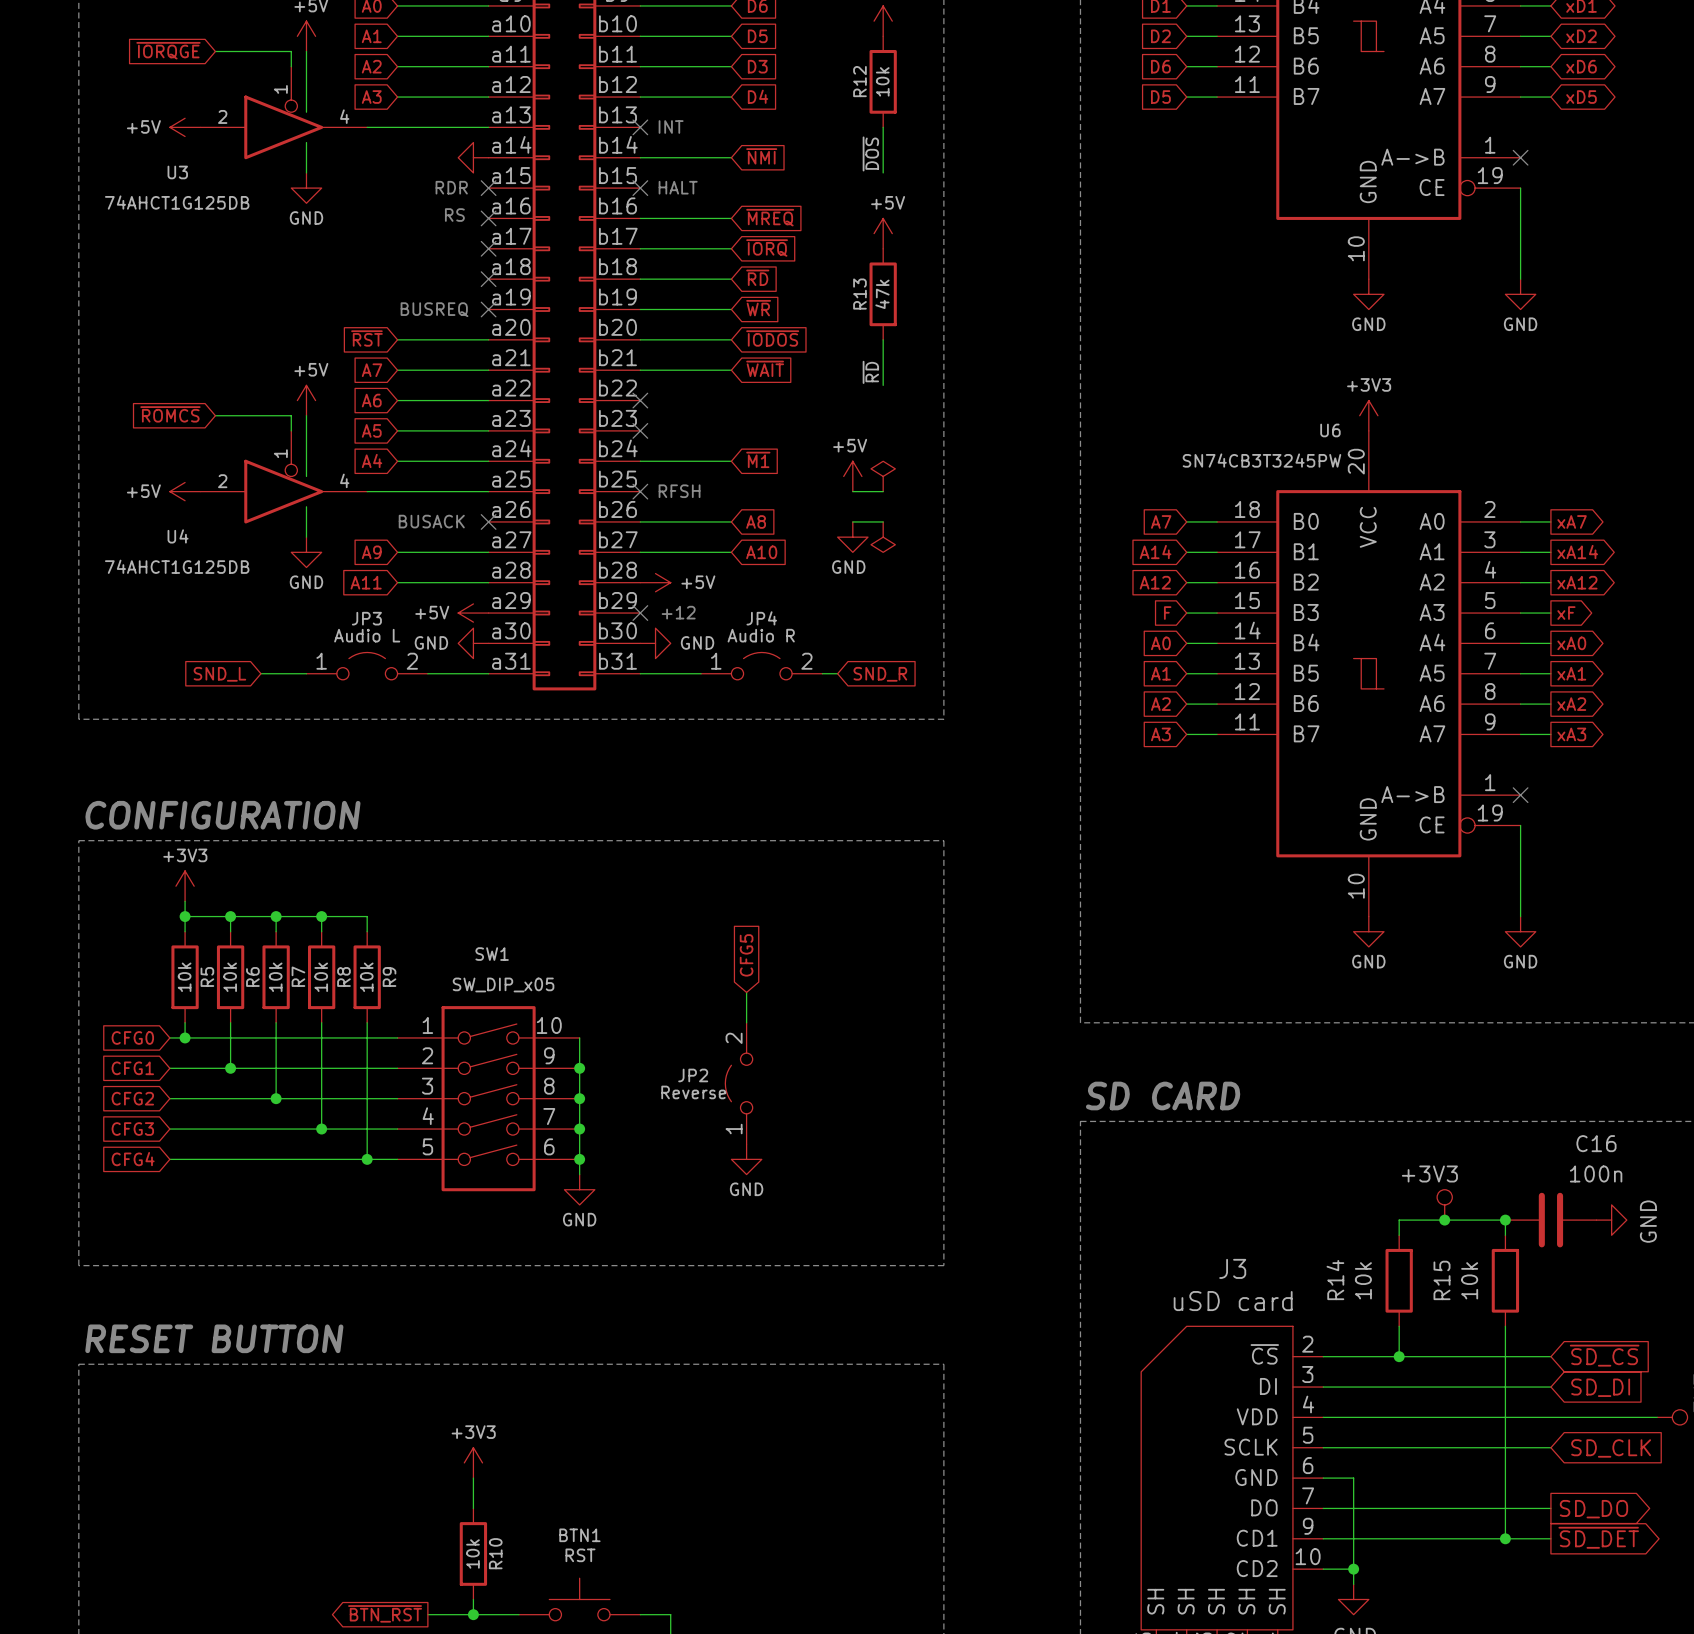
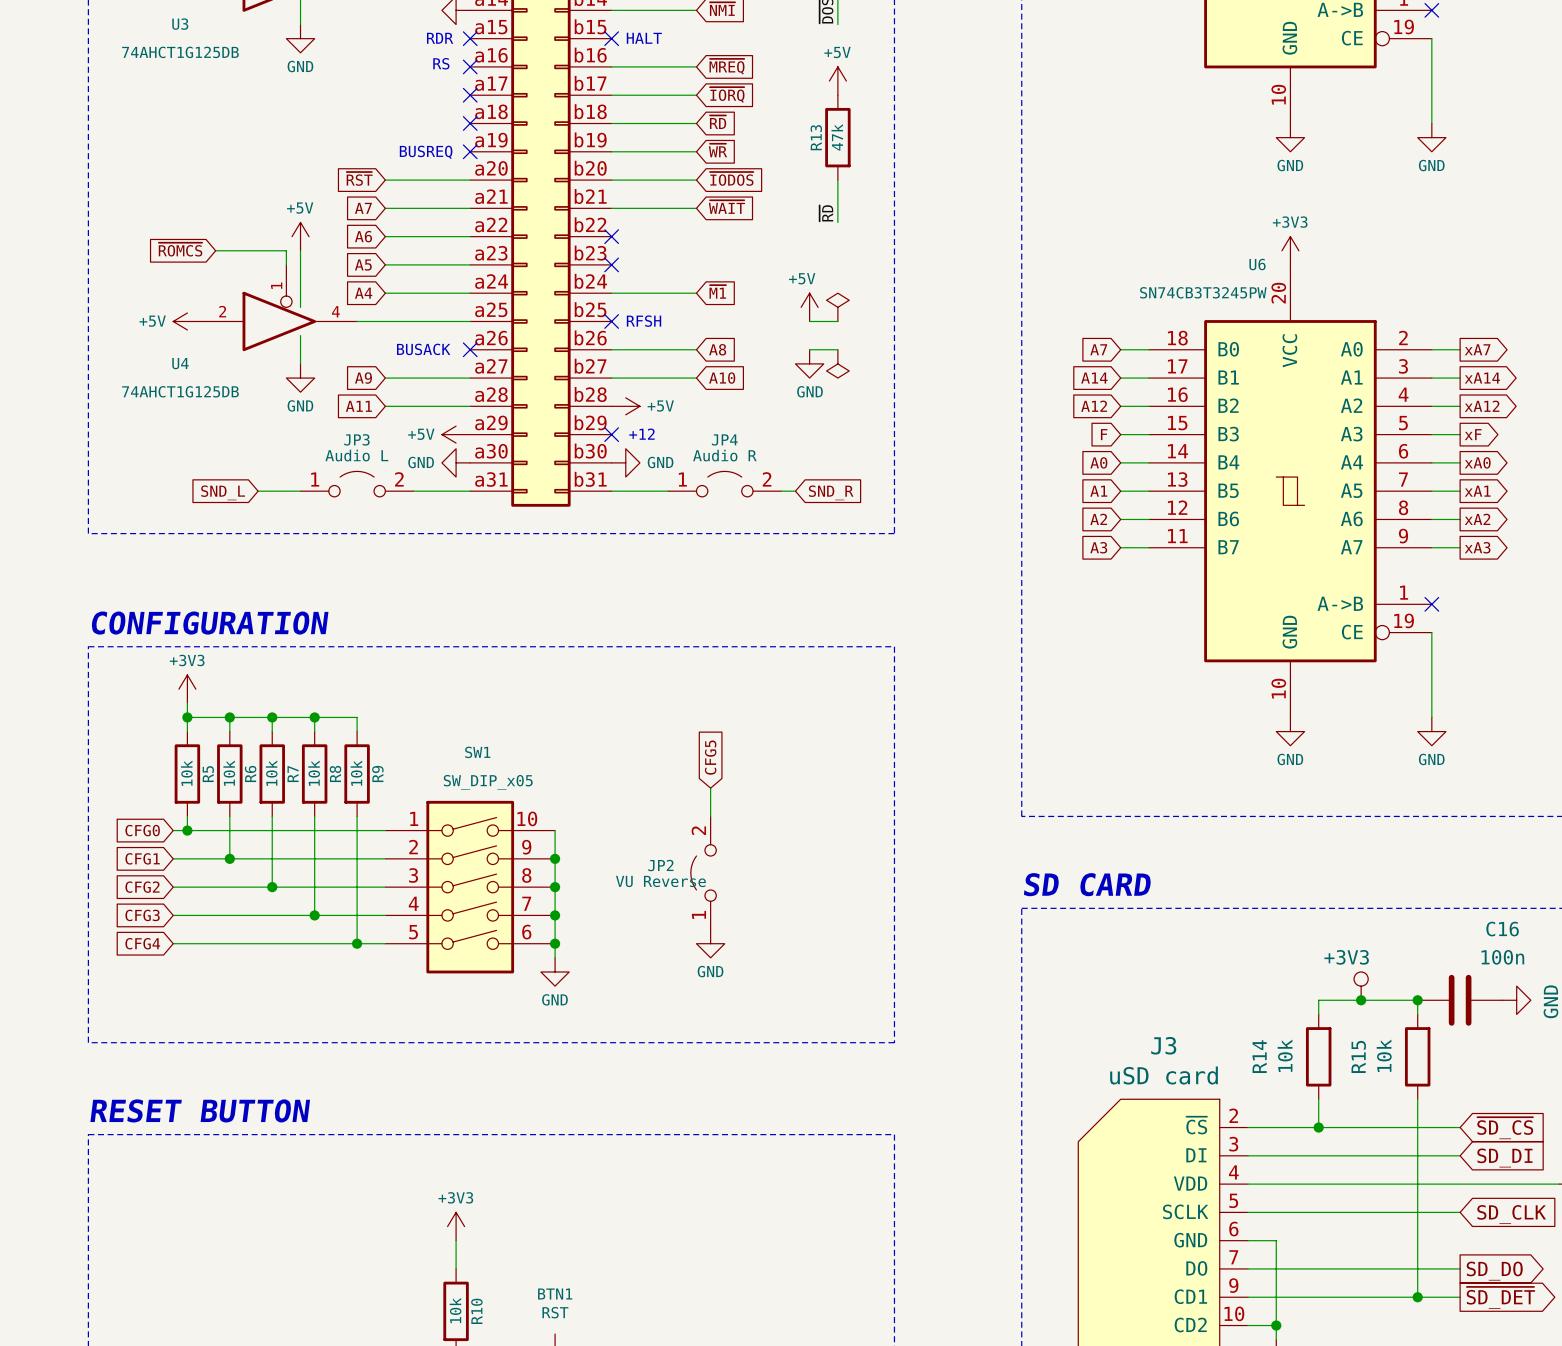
JP2 value: Reverse (693, 1092) -> VU Reverse (660, 881)

